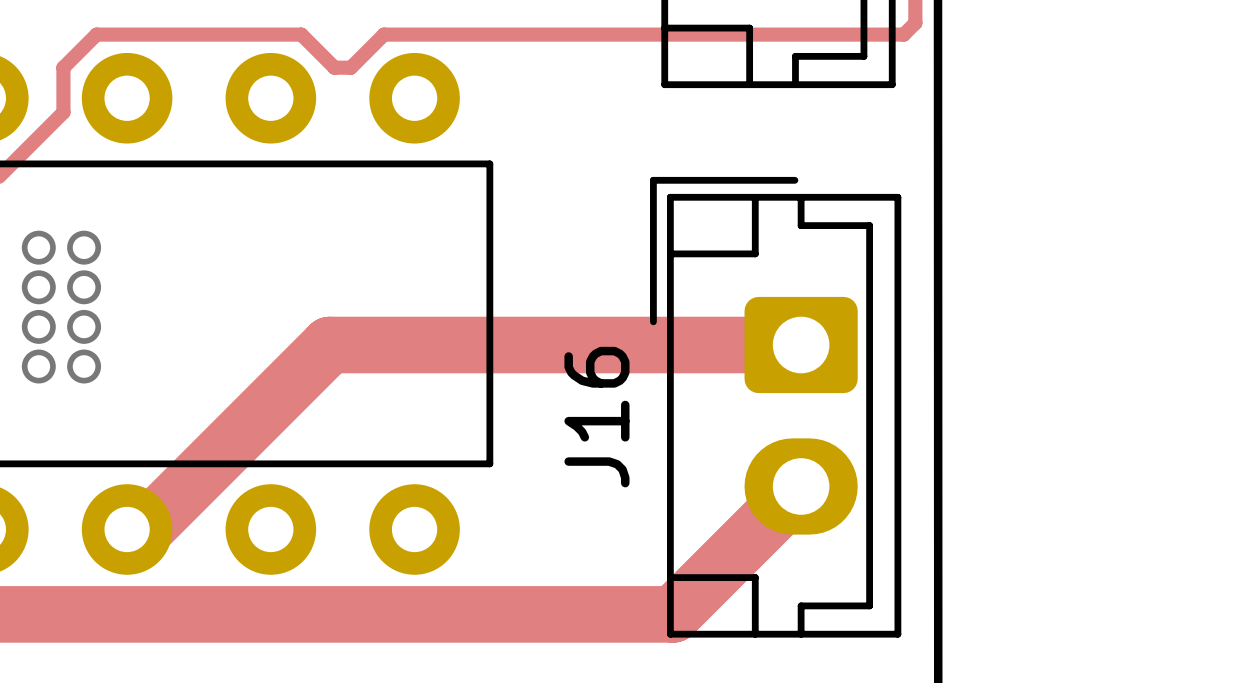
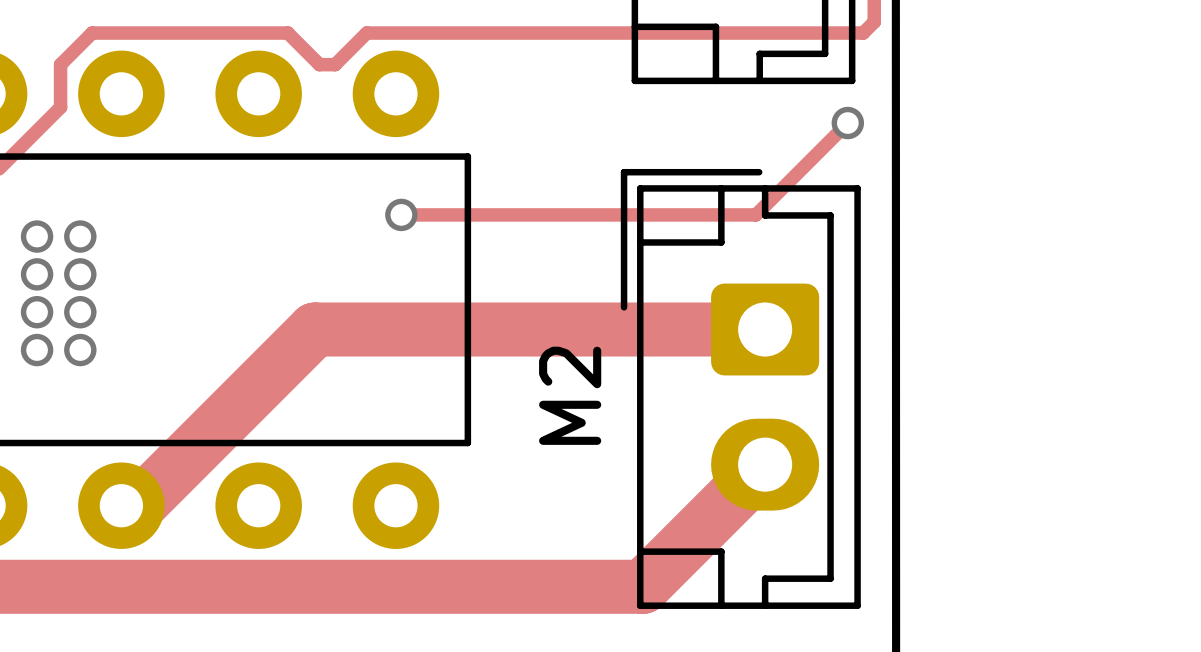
track: none -> (851, 119) (755, 214) (401, 214)
via: none -> (847, 123)
via: none -> (401, 214)
J16 name: J16 (596, 417) -> M2 (570, 395)

